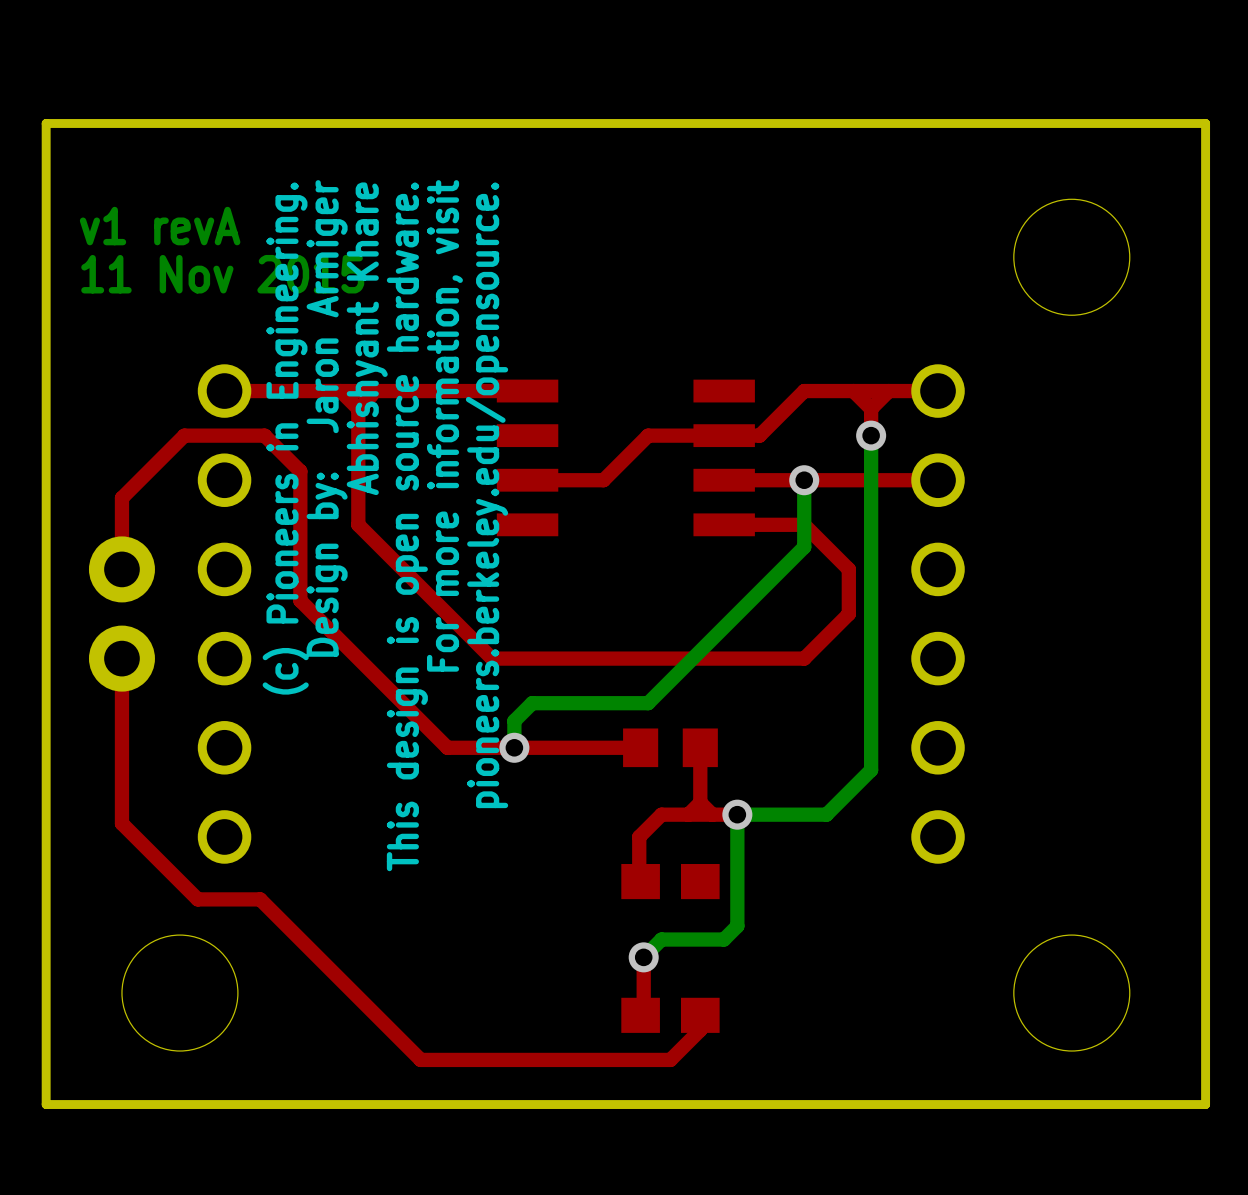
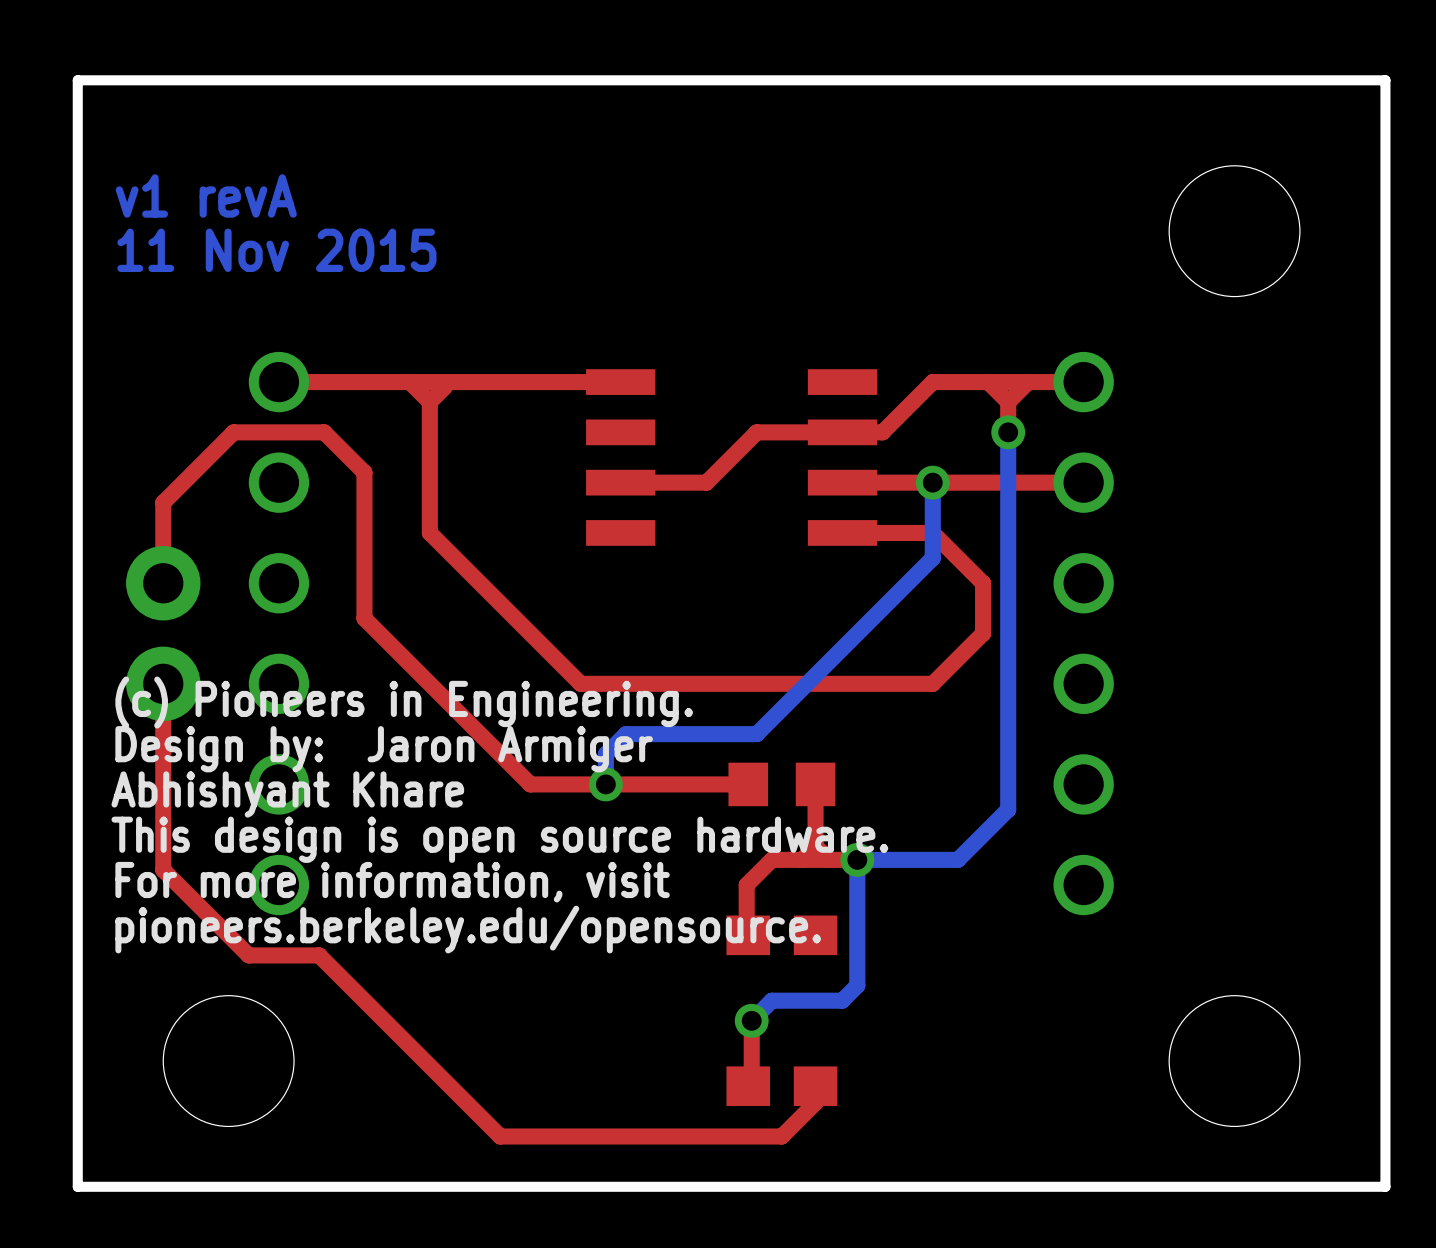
text rotation: 0° (367, 338) -> 90° clockwise (287, 794)
text position: Abhishyant Khare (367, 338) -> Abhishyant Khare (287, 794)
text rotation: 0° (327, 418) -> 90° clockwise (384, 749)
text rotation: 0° (444, 425) -> 90° clockwise (392, 882)
text rotation: 0° (285, 438) -> 90° clockwise (404, 702)
text rotation: 0° (487, 495) -> 90° clockwise (468, 929)
text rotation: 0° (407, 526) -> 90° clockwise (499, 839)

